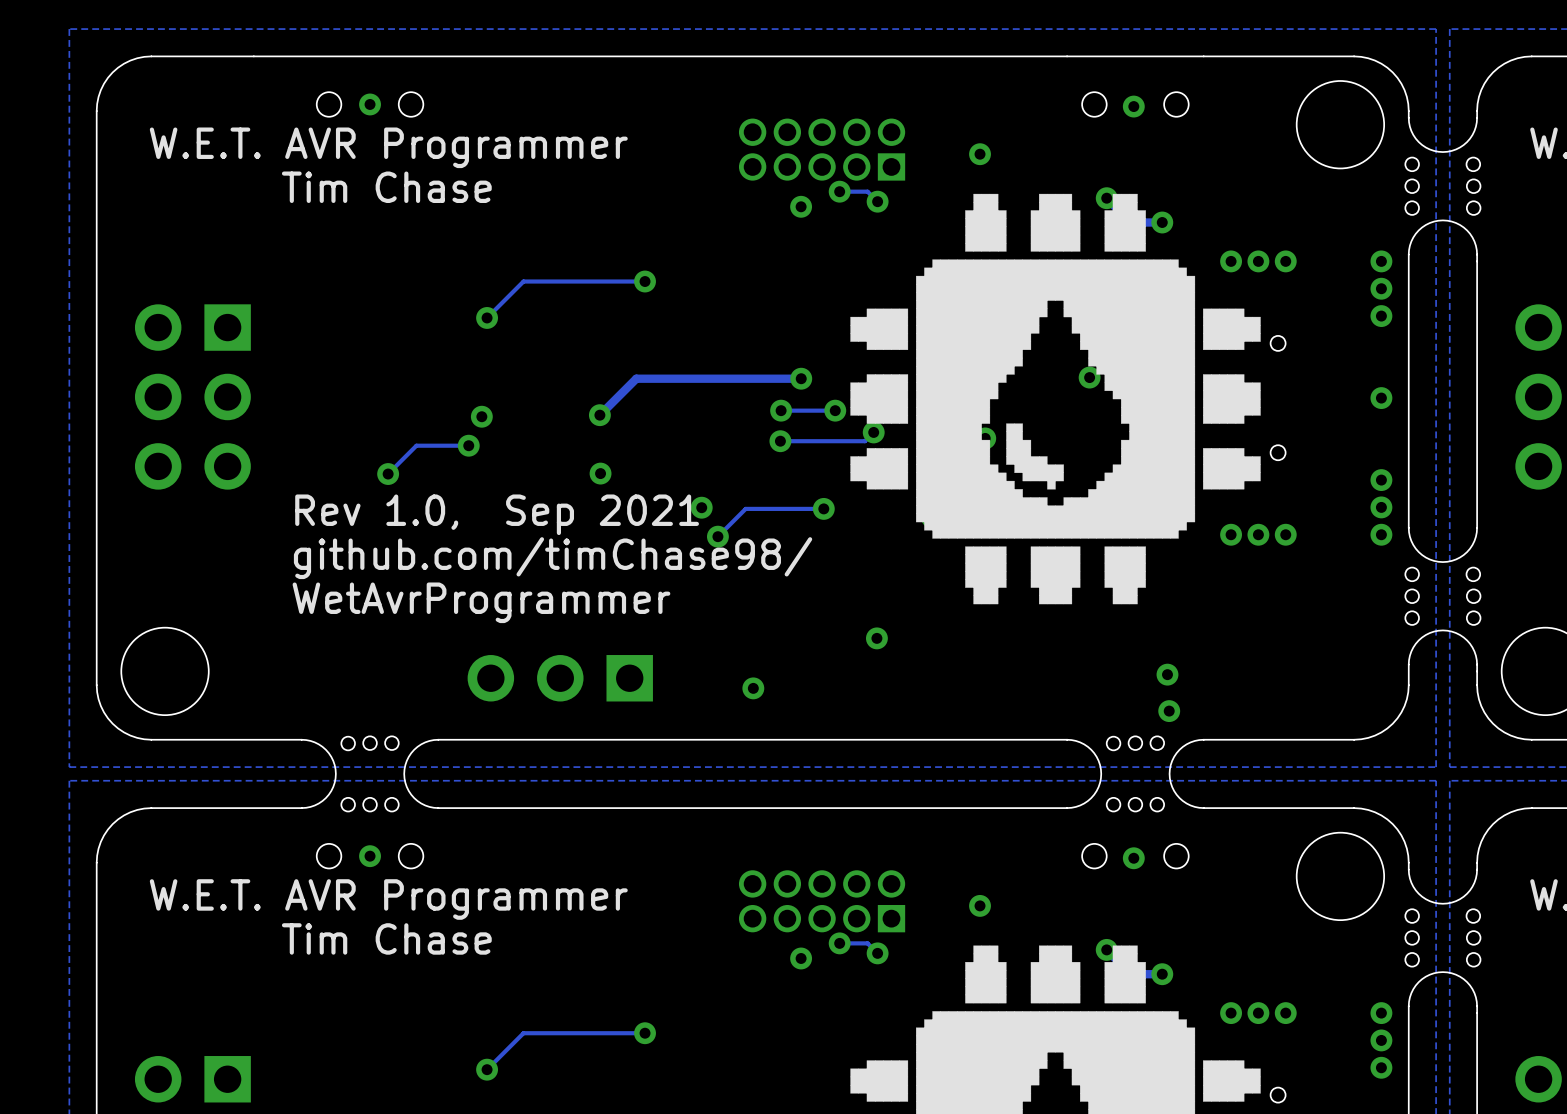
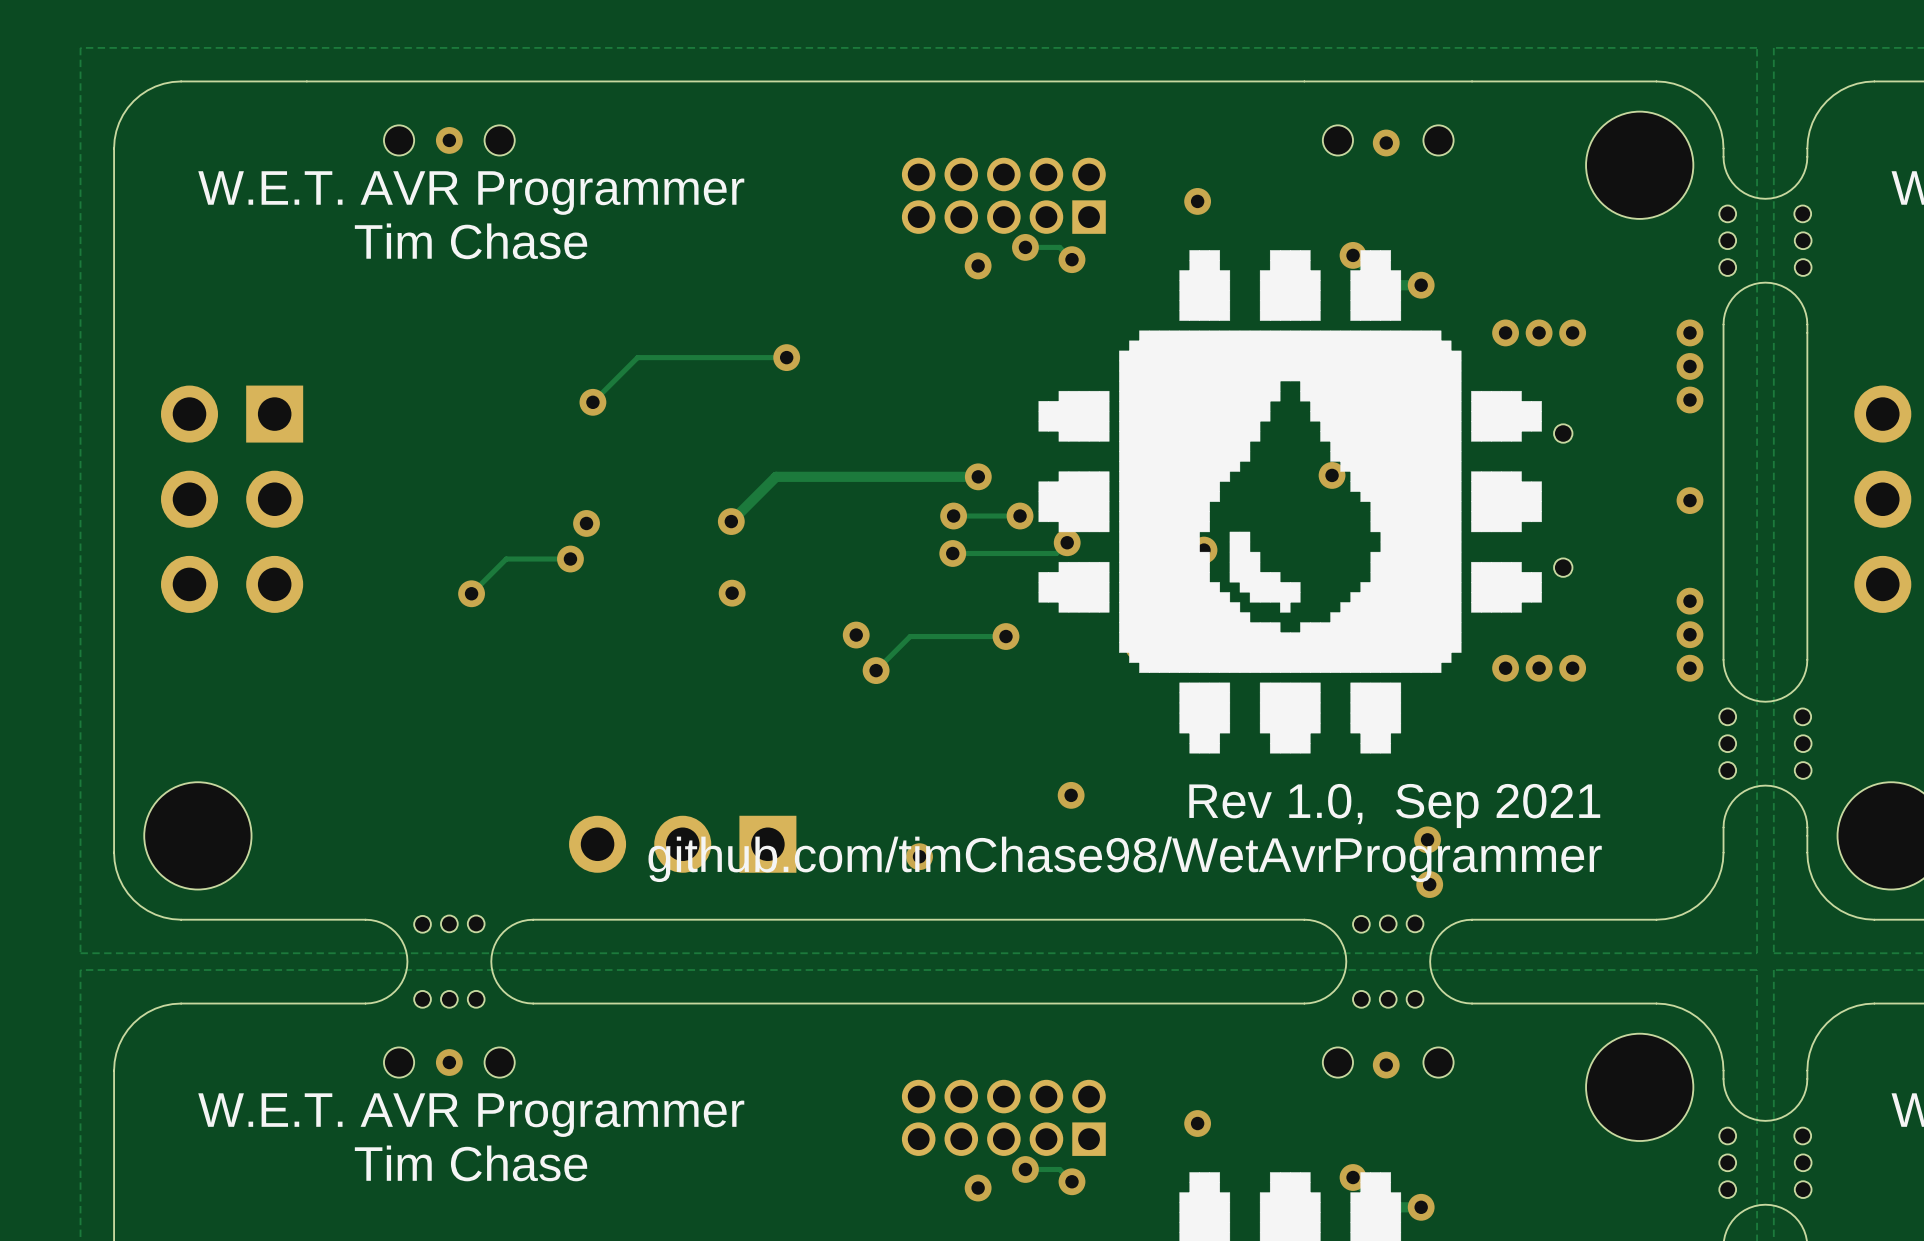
text: Rev 1.0, Sep 2021 (497, 514) -> none
text: github.com/timChase98/ (553, 558) -> none
text: WetAvrProgrammer (481, 602) -> none
text: none -> Rev 1.0, Sep 2021 (1394, 805)
text: none -> github.com/timChase98/WetAvrProgrammer (1125, 859)

